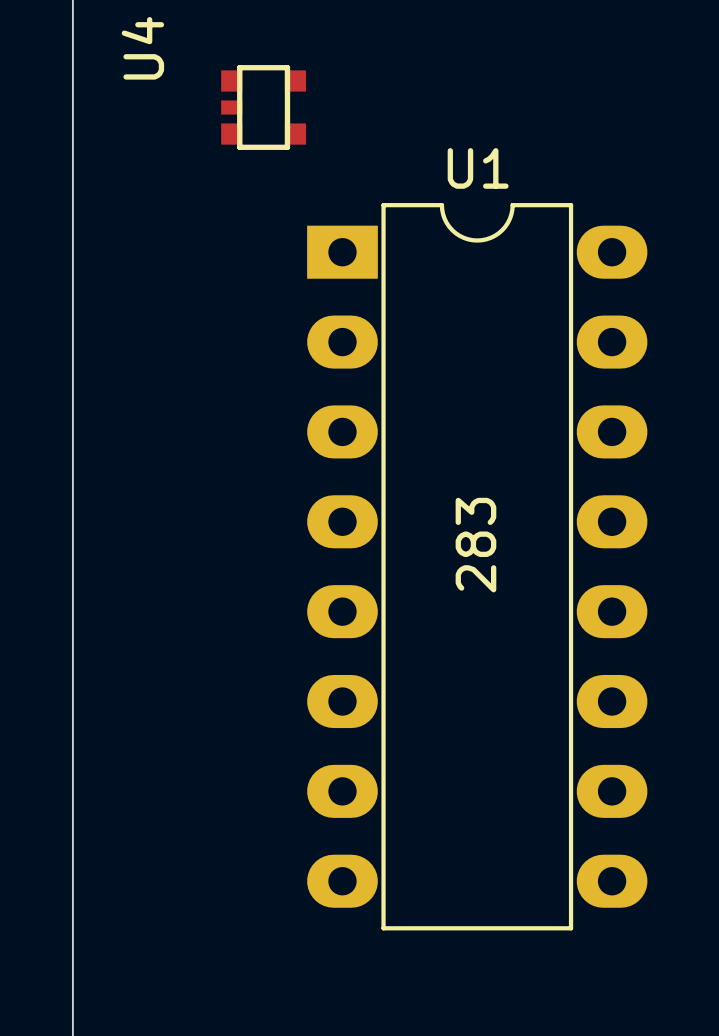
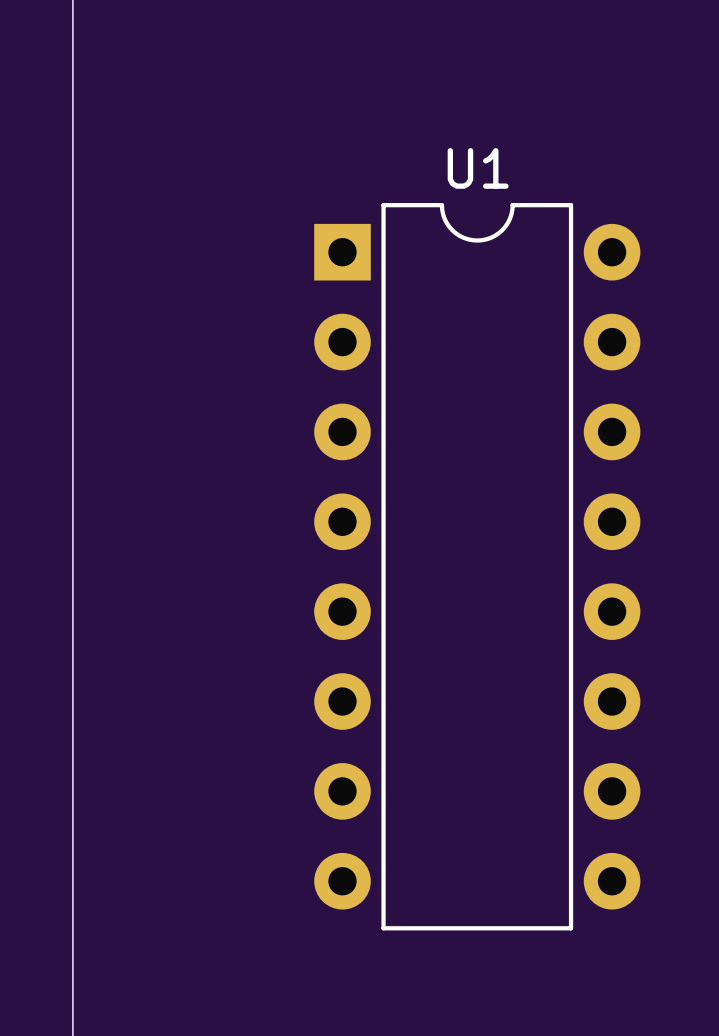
U4: (263, 107) -> none
U1 footprint: [307, 203, 648, 931] -> [314, 203, 641, 931]
text: 283 (475, 545) -> none

